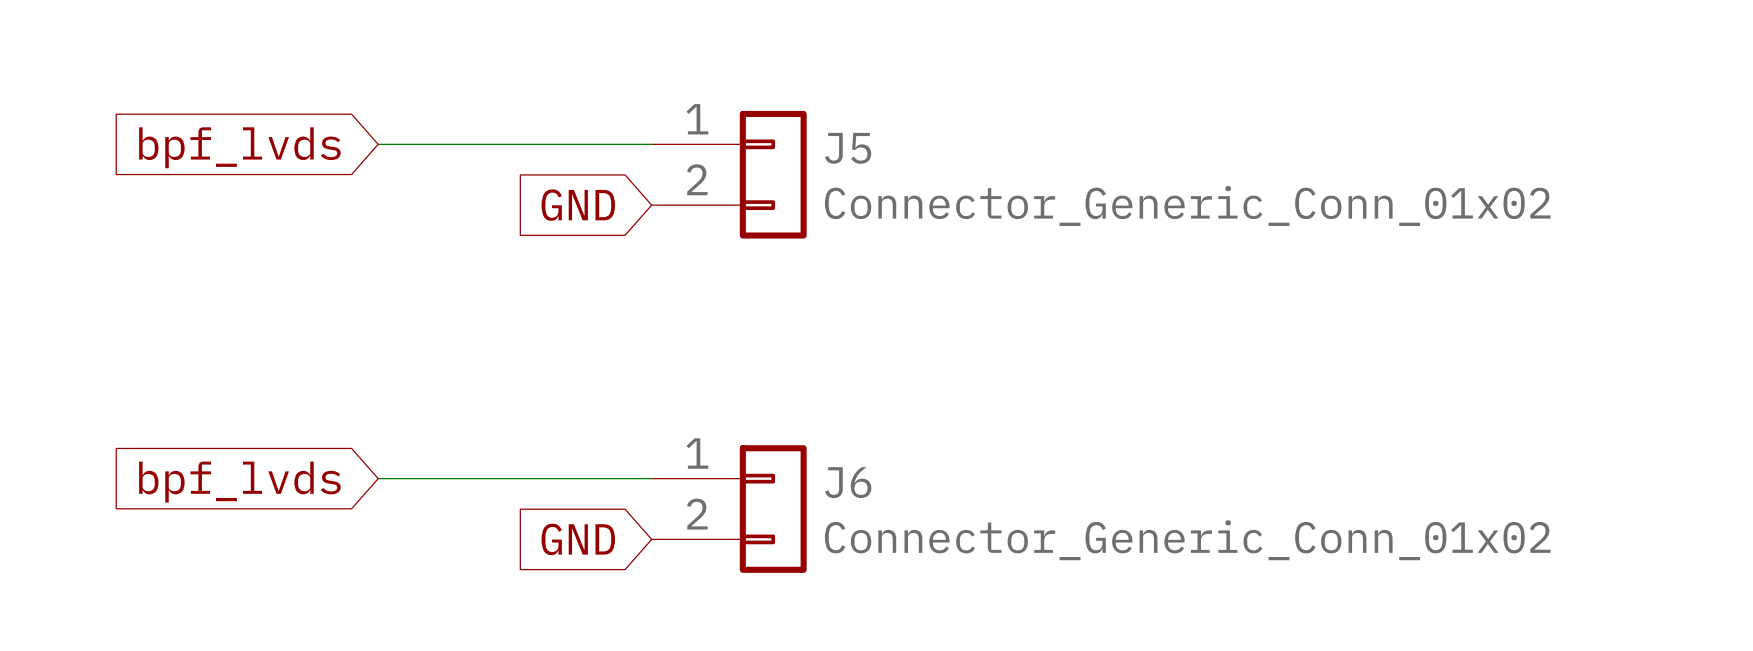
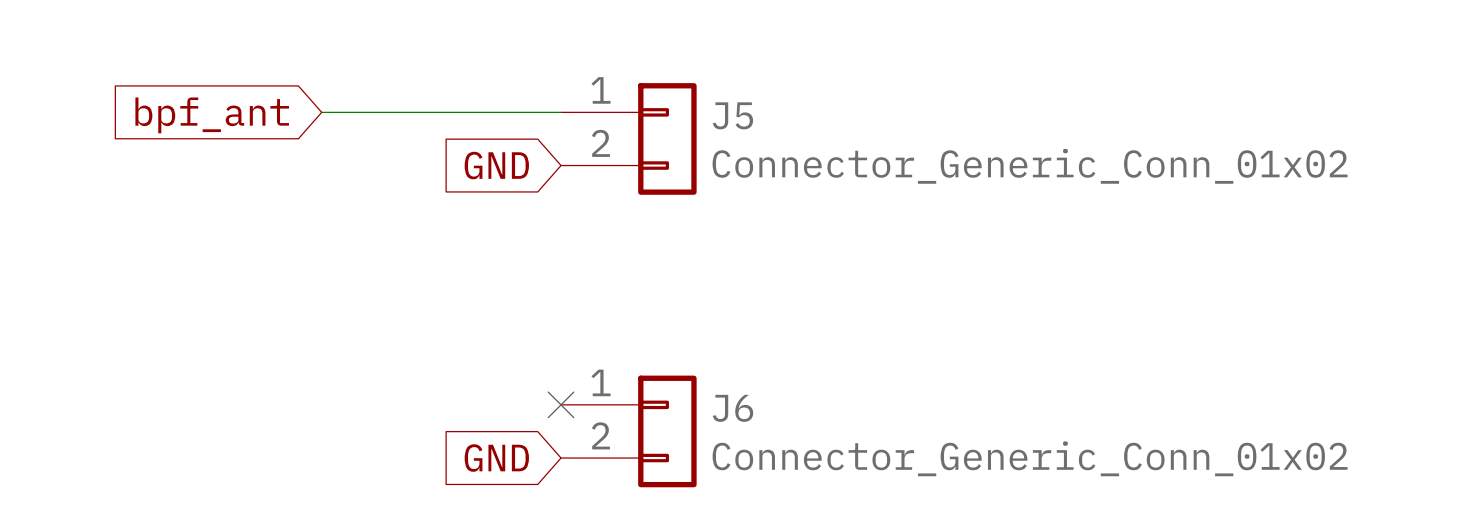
global label: bpf_lvds (239, 147) -> bpf_ant (212, 115)
wire: (378, 478) (651, 478) -> none
no-connect mark: none -> (561, 404)
global label: bpf_lvds (239, 482) -> none

